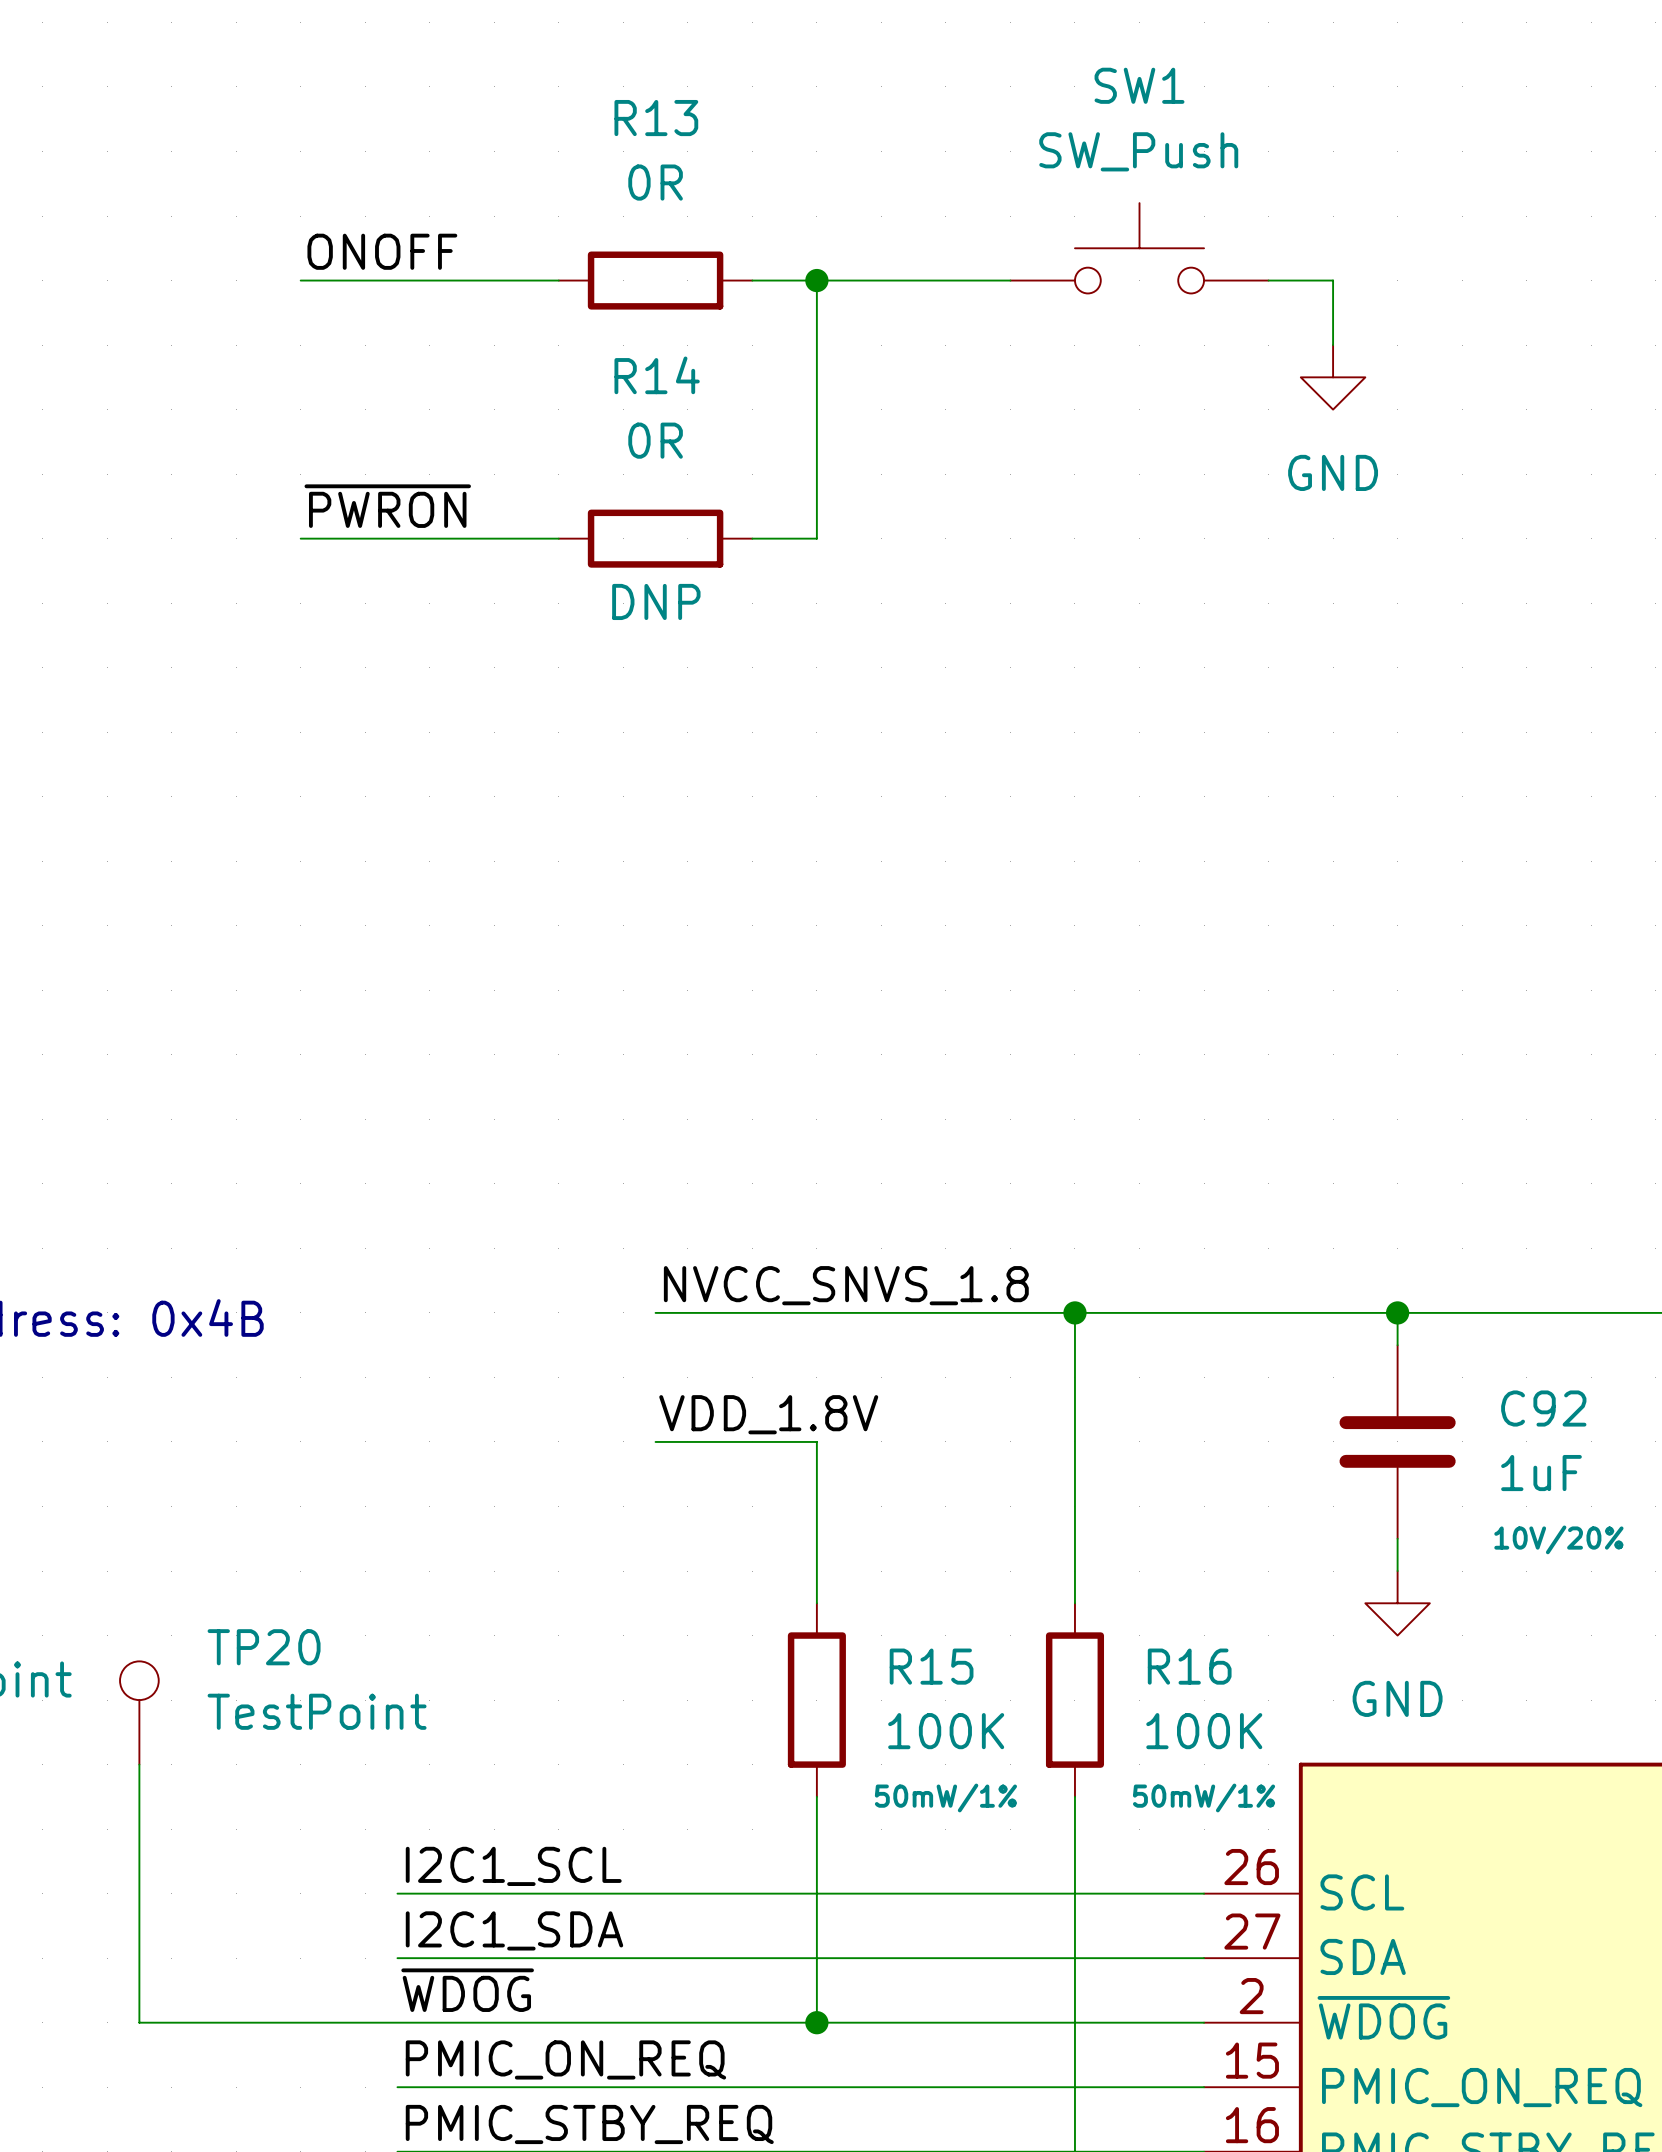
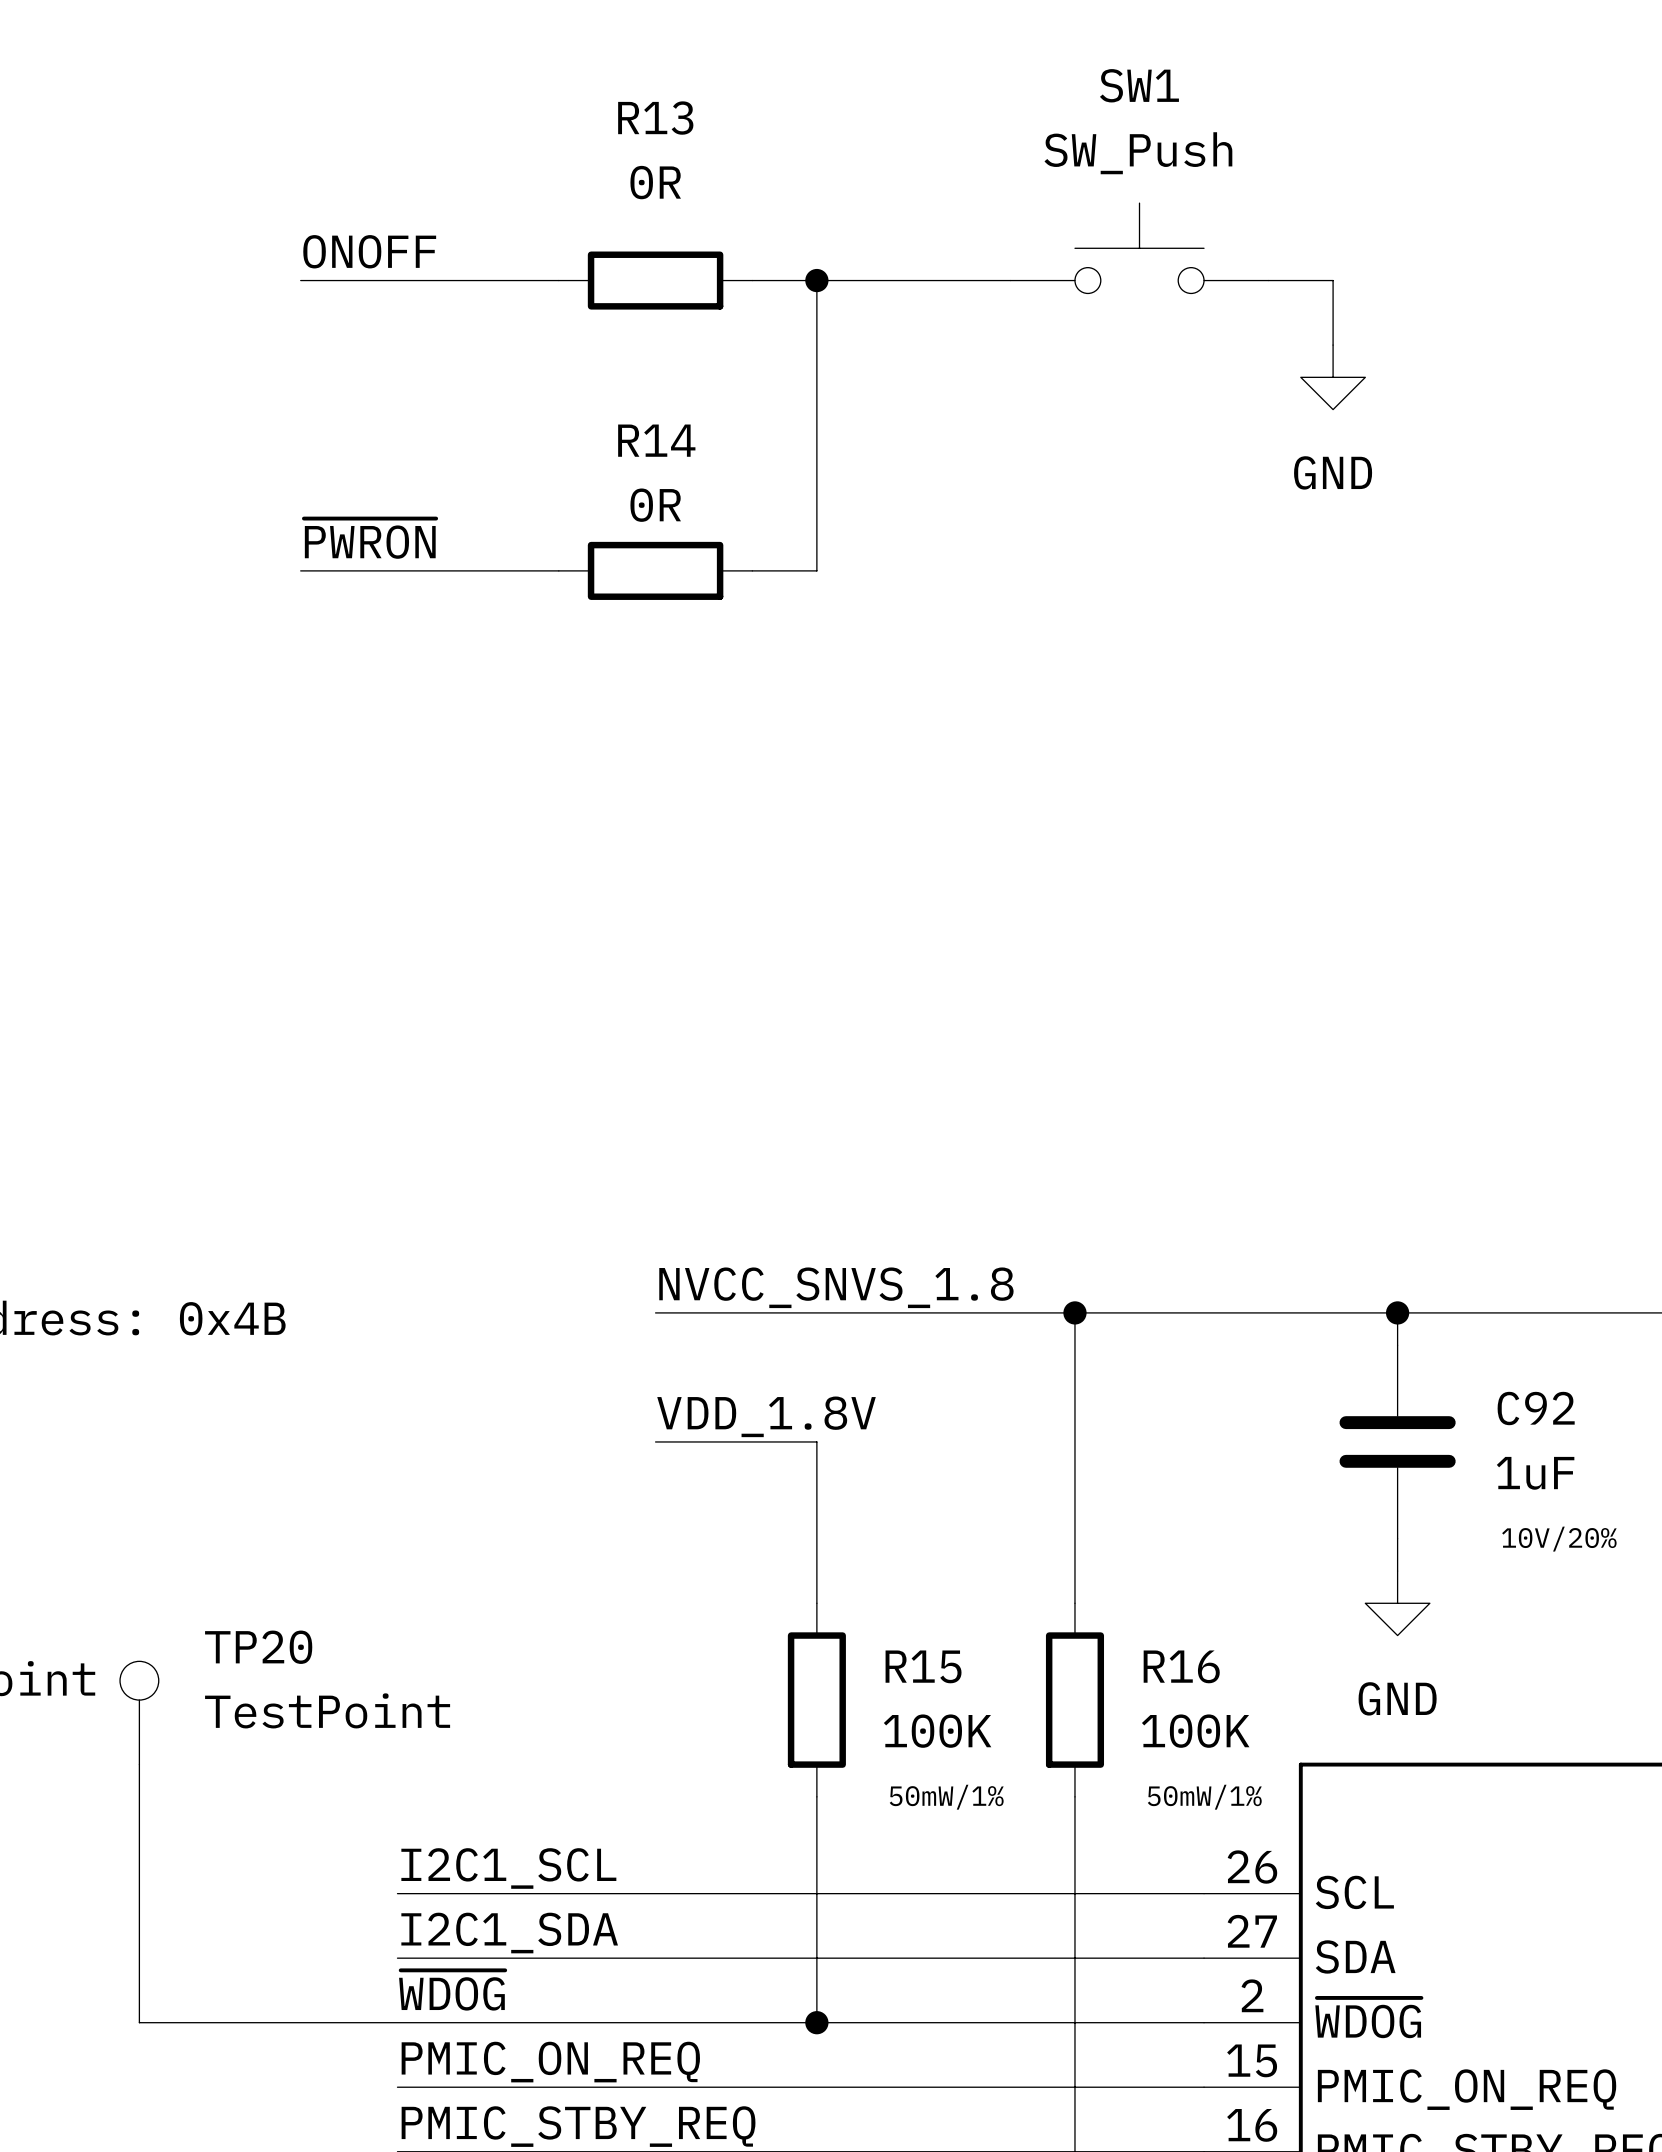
R14 name position: R14 (657, 375) -> R14 (656, 440)
R14 value position: 0R (655, 440) -> 0R (655, 505)
label position: ~{PWRON} (387, 506) -> ~{PWRON} (370, 538)
wire: (300, 538) (558, 538) -> (300, 570) (558, 570)
R14 position: (655, 538) -> (655, 570)
wire: (752, 538) (816, 538) -> (752, 570) (816, 570) (816, 538)
R14 text: DNP (656, 601) -> none

